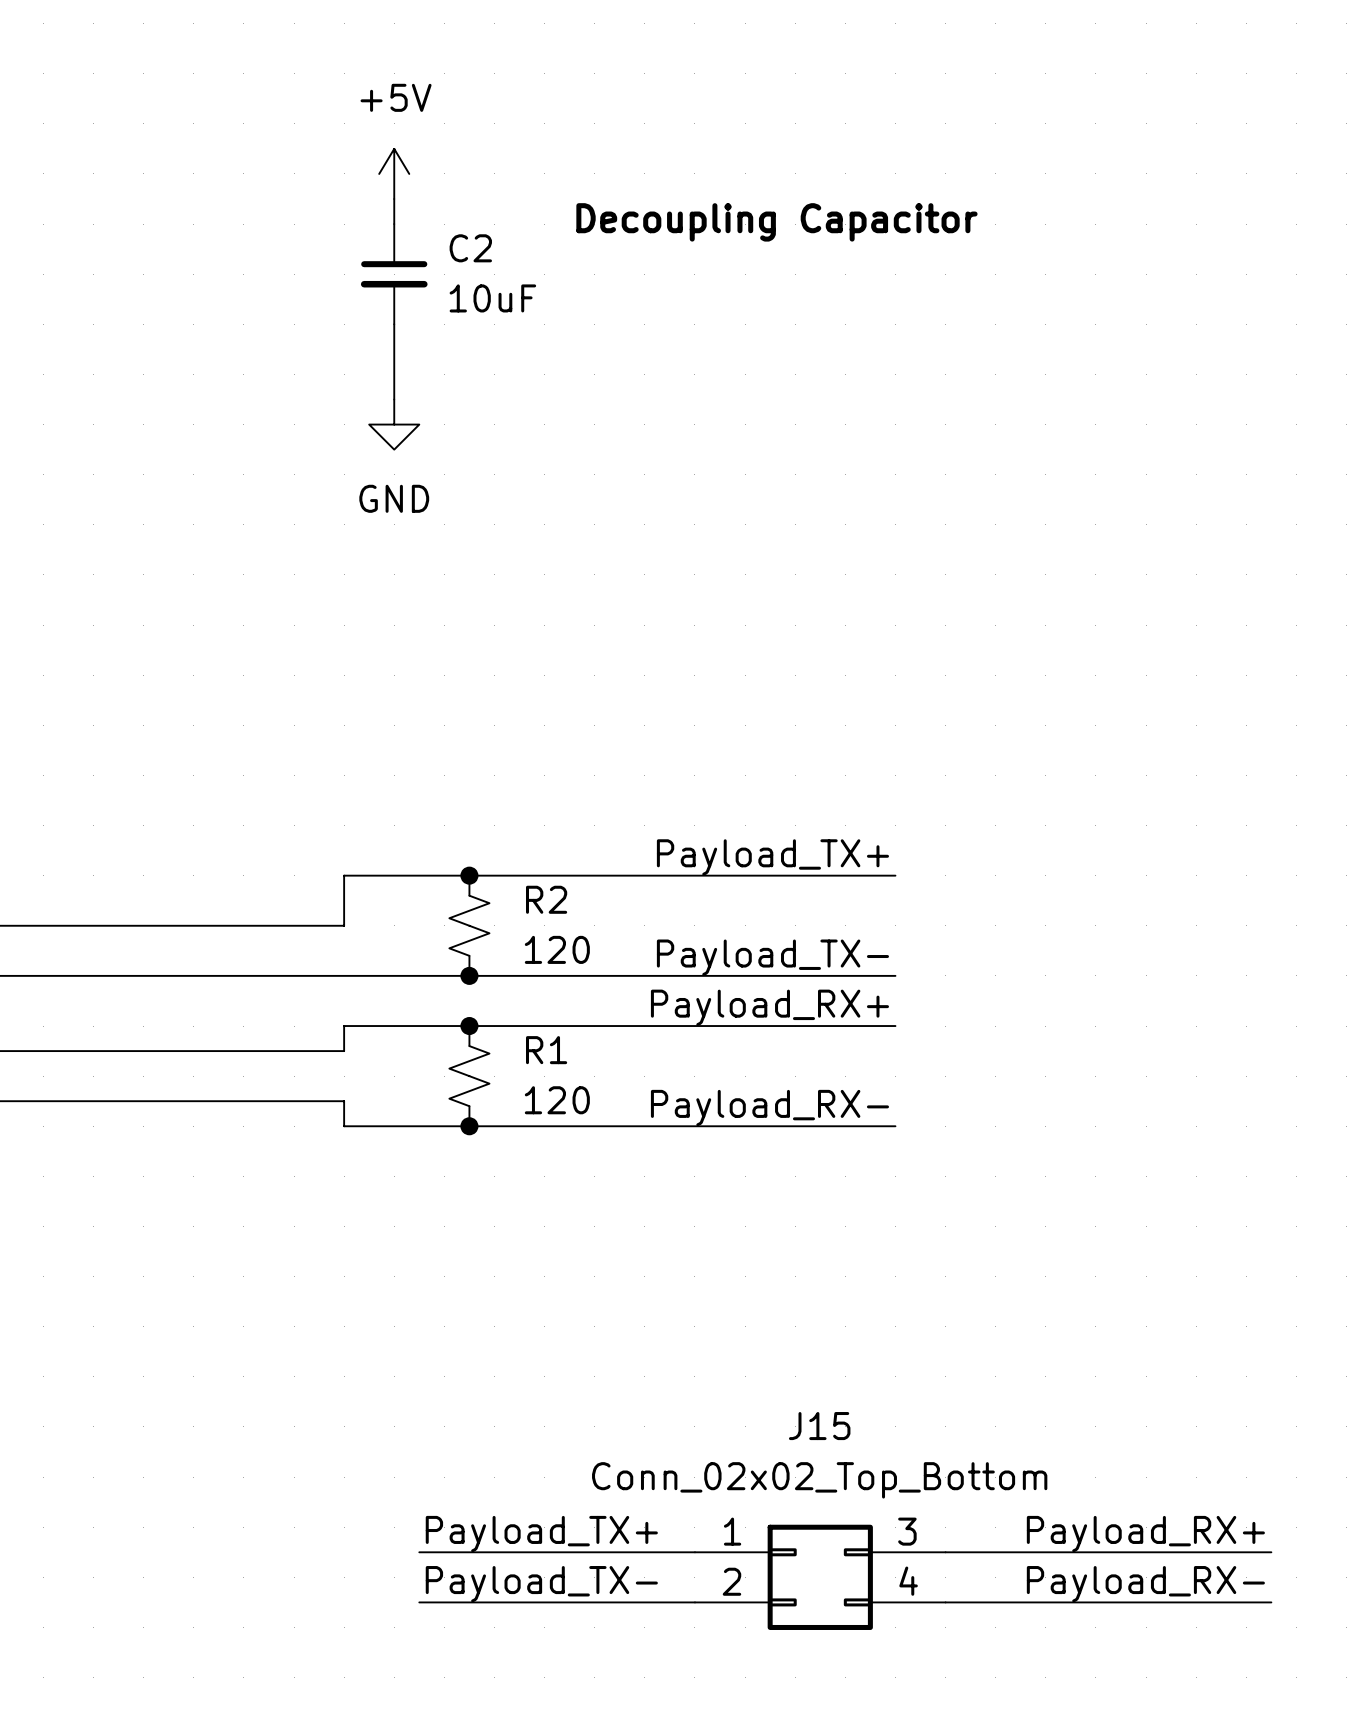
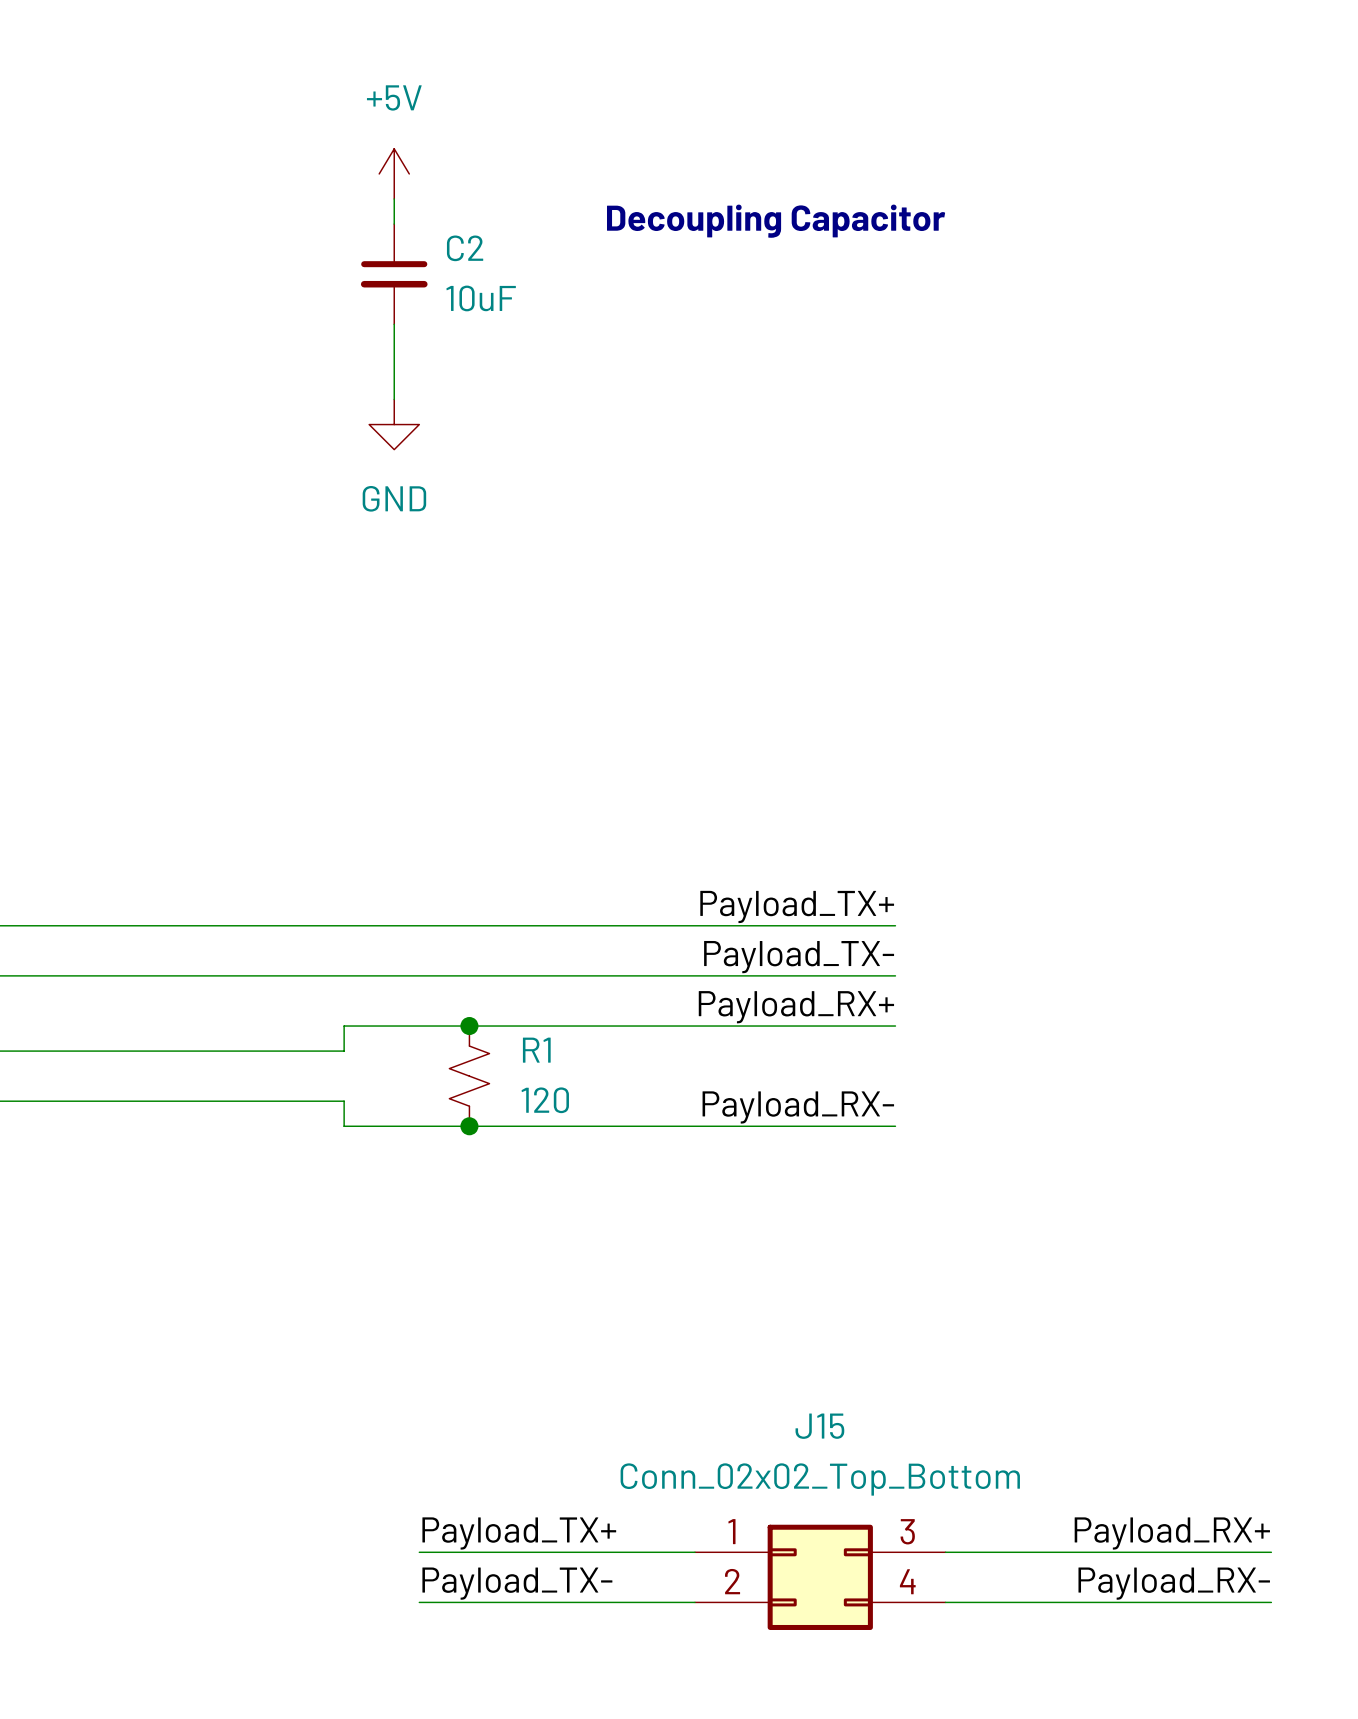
label position: Payload_TX+ (772, 857) -> Payload_TX+ (797, 906)
junction: (469, 875) -> none
wire: (895, 875) (344, 875) (344, 925) -> (895, 925) (344, 925)
R2: 120 (469, 925) -> none
junction: (469, 975) -> none

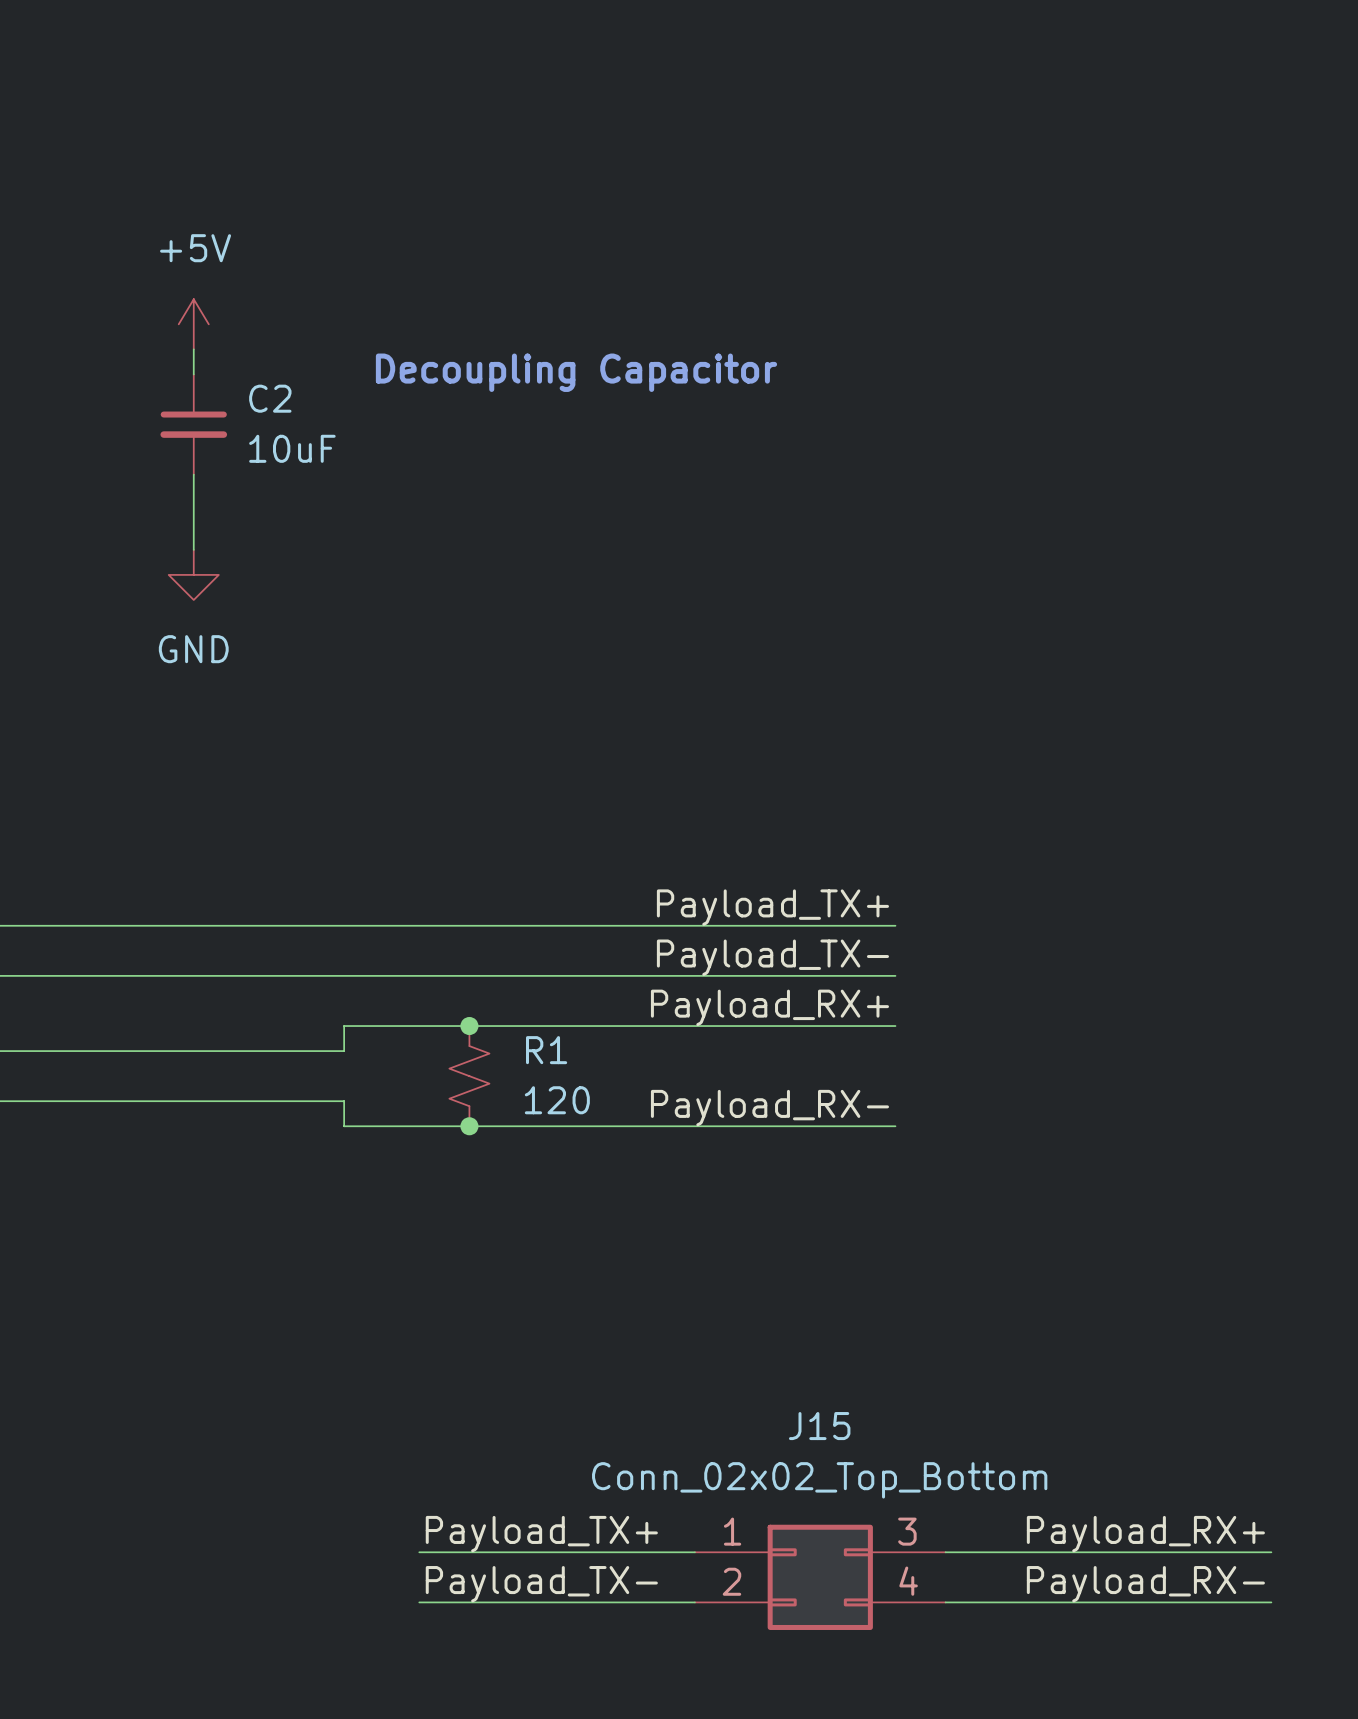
power symbol position: +5V (394, 173) -> +5V (193, 324)
wire: (394, 199) (394, 224) -> (193, 349) (193, 374)
text position: Decoupling Capacitor (776, 221) -> Decoupling Capacitor (576, 372)
C2 position: (394, 274) -> (193, 424)
wire: (394, 324) (394, 399) -> (193, 474) (193, 549)
power symbol position: GND (394, 424) -> GND (193, 574)

